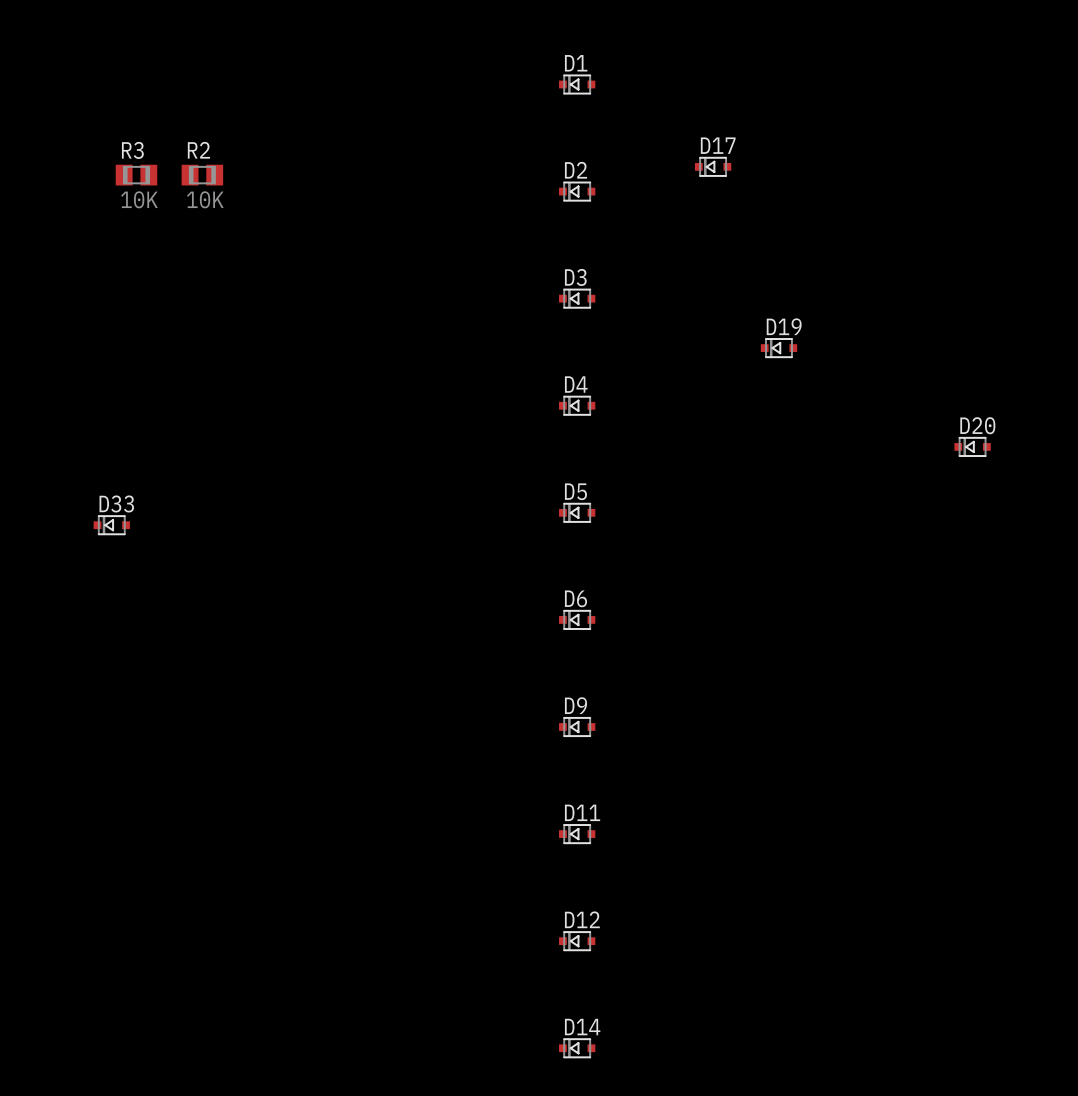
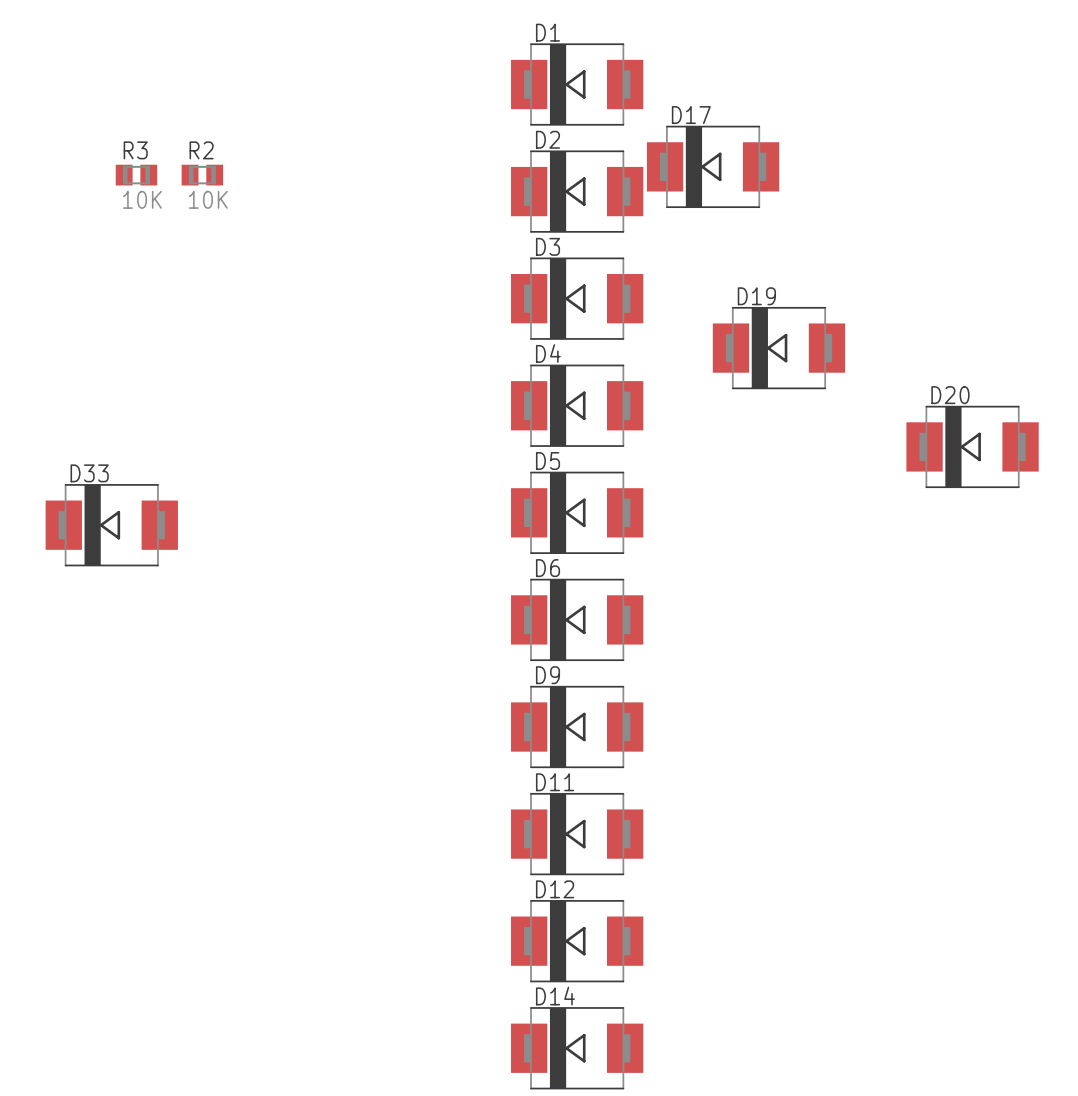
D1 name position: D1 (576, 63) -> D1 (548, 32)
D1 footprint: [559, 74, 596, 95] -> [511, 43, 644, 126]
D17 name position: D17 (718, 145) -> D17 (691, 115)
D17 footprint: [694, 156, 732, 177] -> [646, 125, 780, 208]
D2 name position: D2 (575, 170) -> D2 (548, 139)
D2 footprint: [559, 181, 596, 202] -> [511, 150, 644, 233]
D3 name position: D3 (575, 277) -> D3 (548, 246)
D3 footprint: [559, 288, 596, 309] -> [511, 257, 644, 340]
D19 name position: D19 (784, 326) -> D19 (756, 296)
D19 footprint: [760, 338, 798, 359] -> [712, 307, 846, 390]
D4 name position: D4 (576, 384) -> D4 (548, 353)
D4 footprint: [559, 395, 596, 416] -> [511, 364, 644, 447]
D20 name position: D20 (977, 425) -> D20 (950, 395)
D20 footprint: [954, 436, 991, 458] -> [906, 406, 1039, 488]
D5 name position: D5 (575, 491) -> D5 (548, 461)
D5 footprint: [559, 502, 596, 523] -> [511, 471, 644, 554]
D33 name position: D33 (116, 503) -> D33 (89, 473)
D33 footprint: [93, 515, 130, 536] -> [45, 484, 178, 567]
D6 name position: D6 (575, 598) -> D6 (548, 568)
D6 footprint: [559, 609, 596, 630] -> [511, 578, 644, 661]
D9 name position: D9 (575, 705) -> D9 (548, 675)
D9 footprint: [559, 716, 596, 738] -> [511, 686, 644, 768]
D11 name position: D11 (582, 812) -> D11 (555, 782)
D11 footprint: [559, 824, 596, 845] -> [511, 793, 644, 876]
D12 name position: D12 (582, 919) -> D12 (555, 889)
D12 footprint: [559, 931, 596, 952] -> [511, 900, 644, 983]
D14 name position: D14 (582, 1027) -> D14 (555, 996)
D14 footprint: [559, 1038, 596, 1059] -> [511, 1007, 644, 1090]

